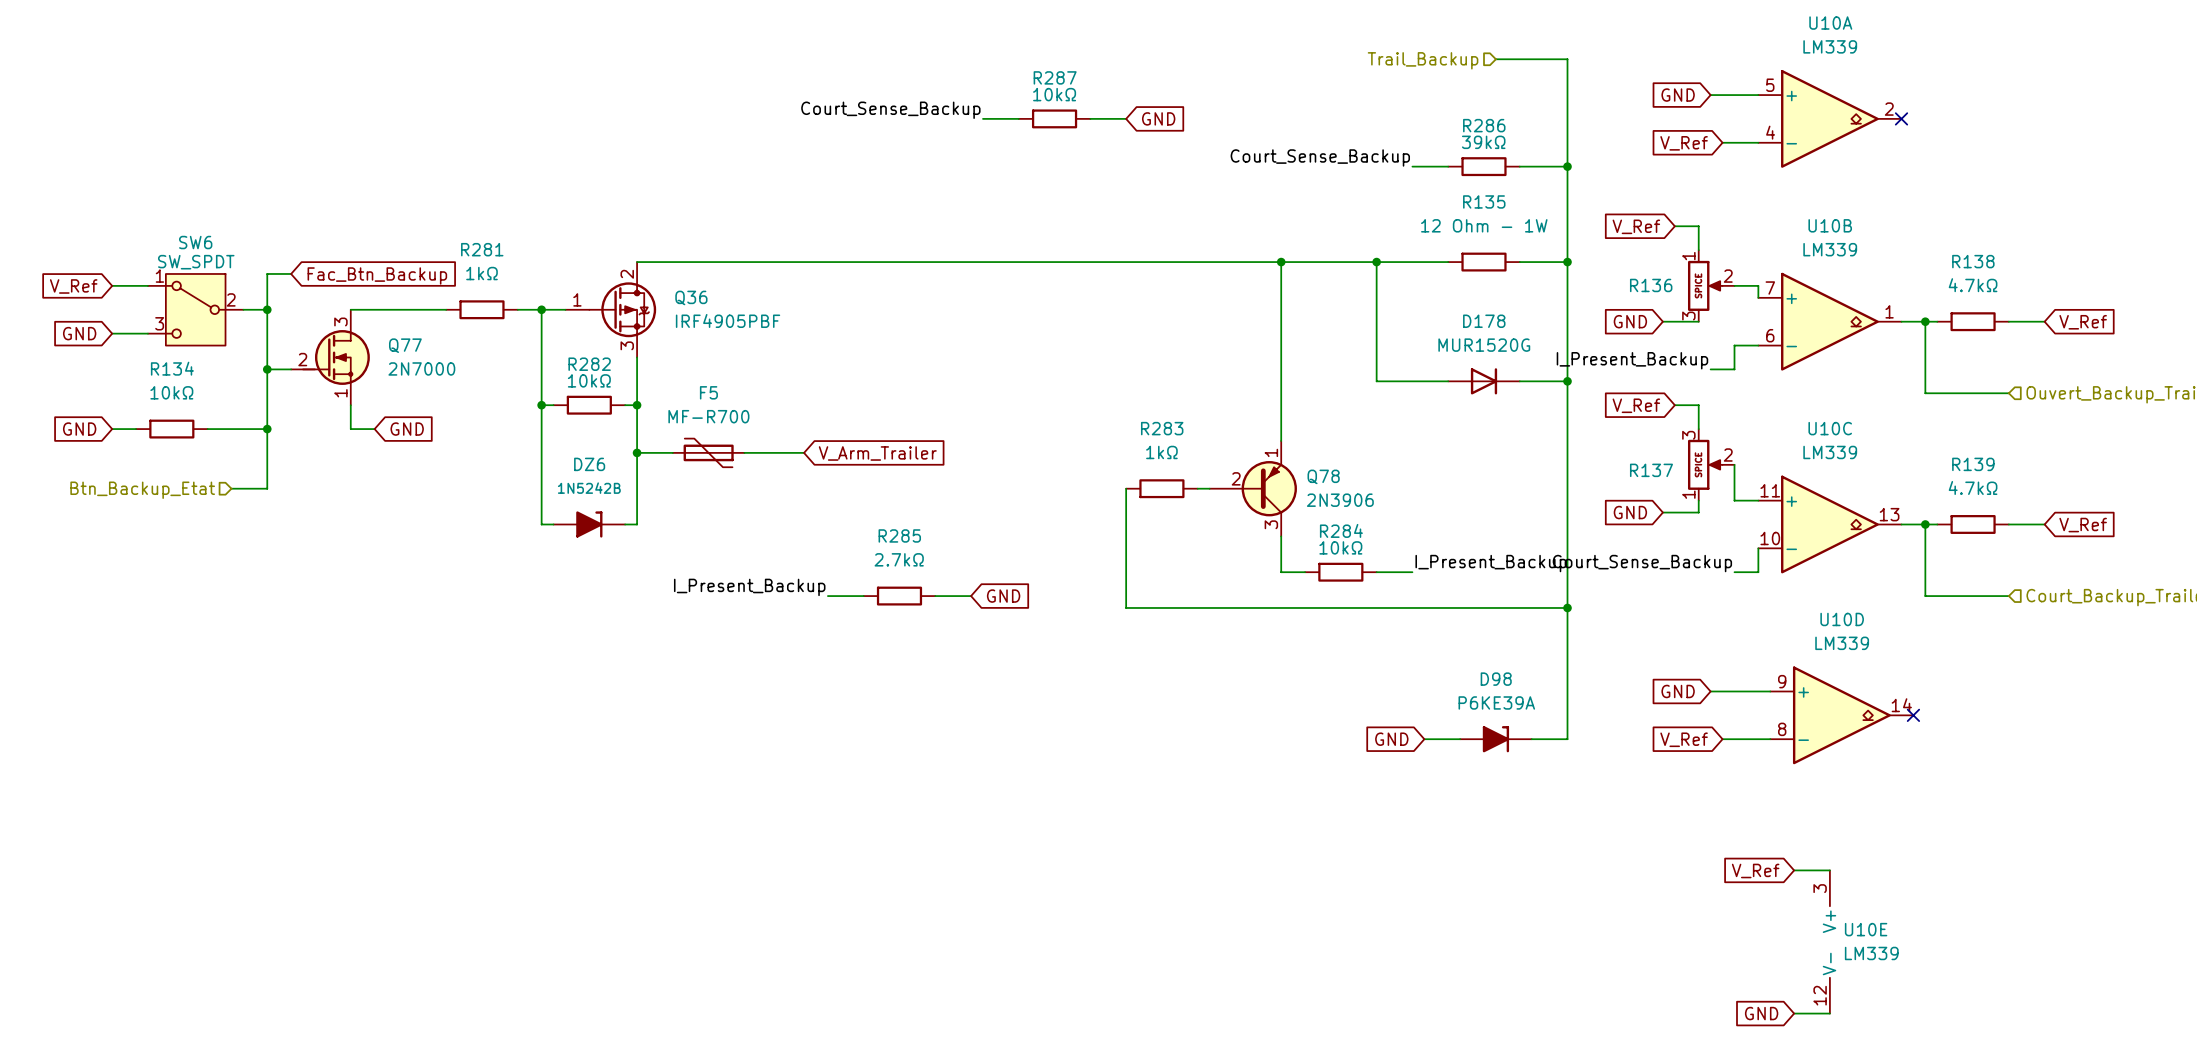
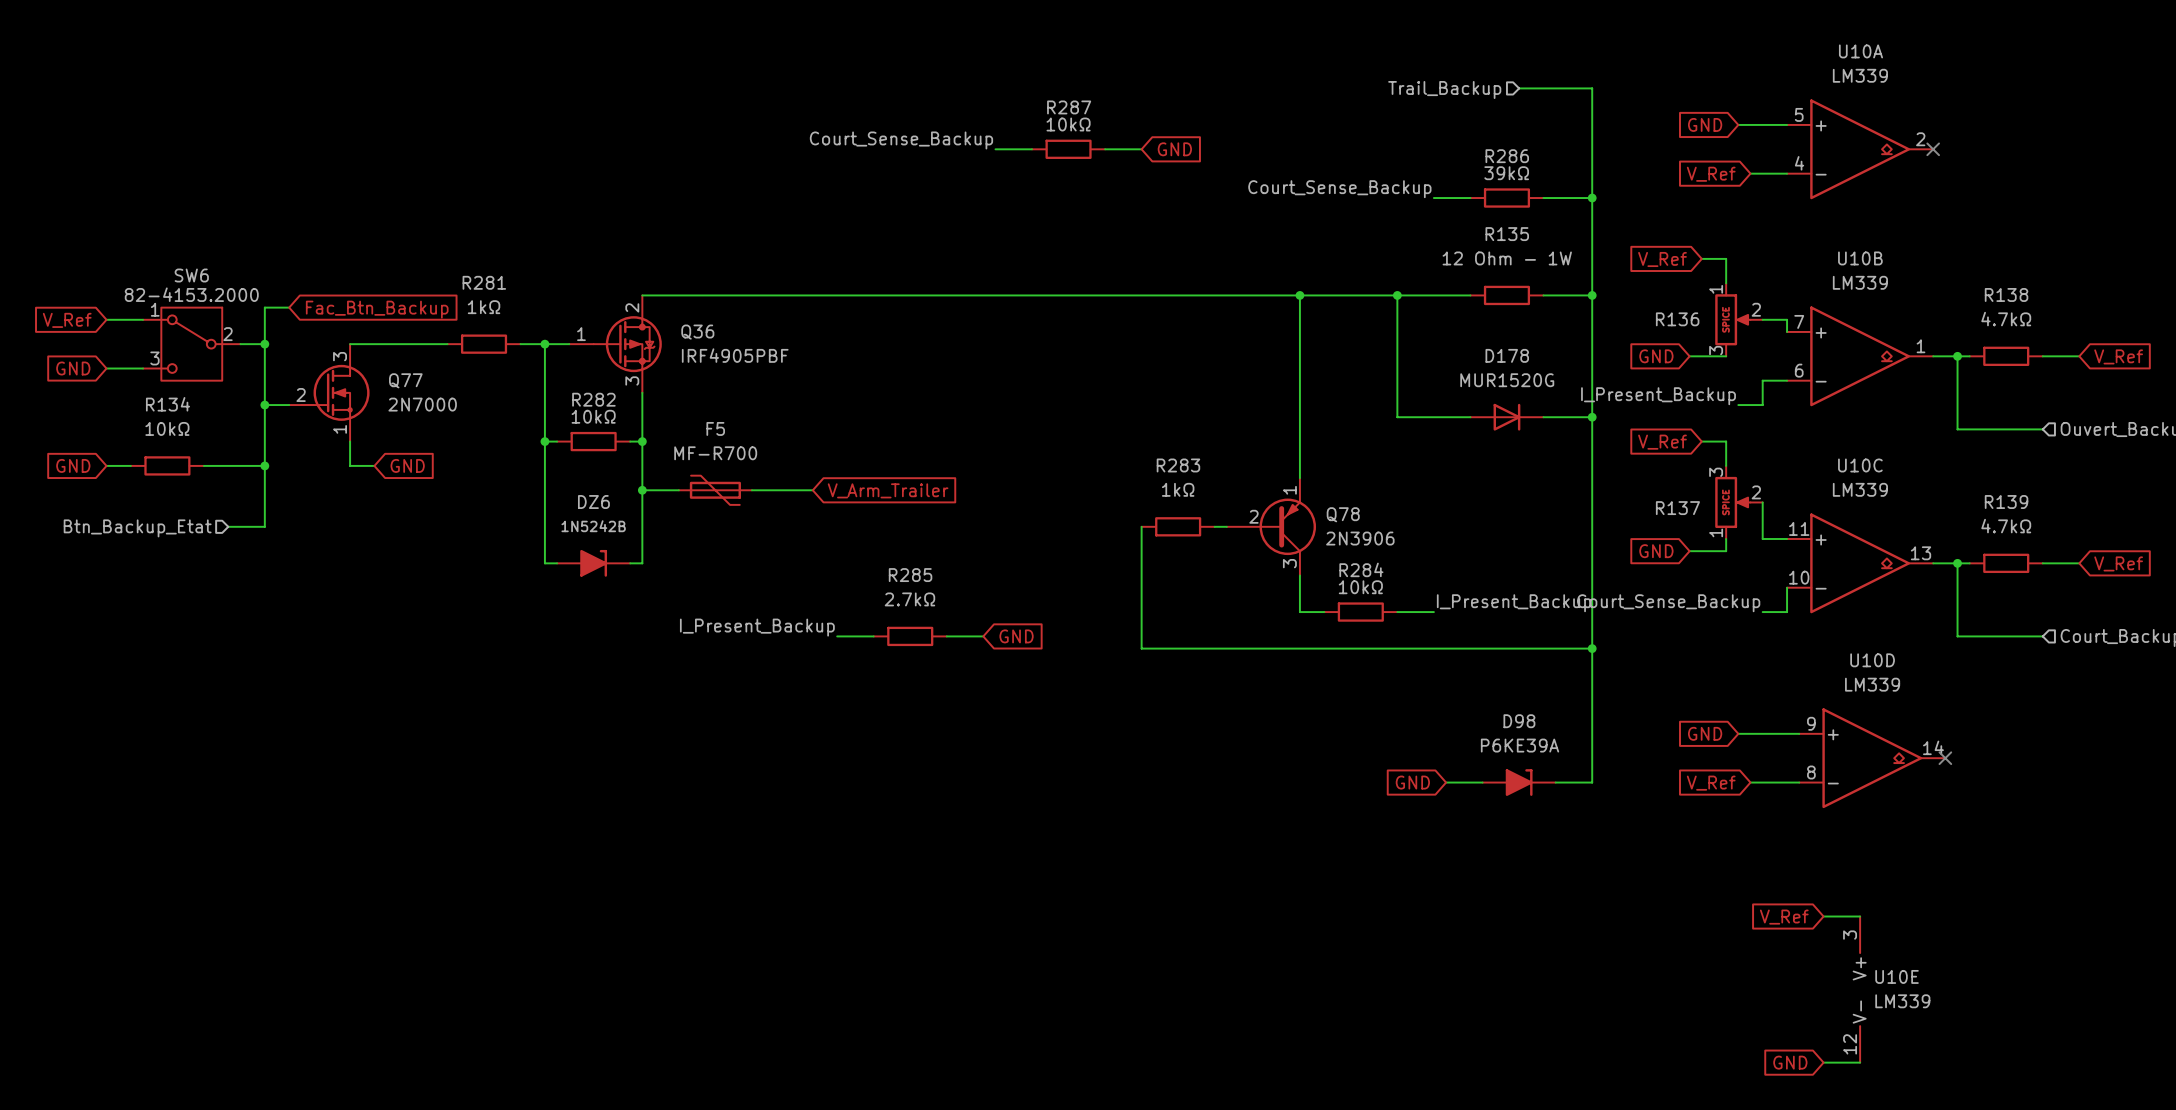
SW6 value: SW_SPDT (196, 262) -> 82-4153.2000 (191, 294)

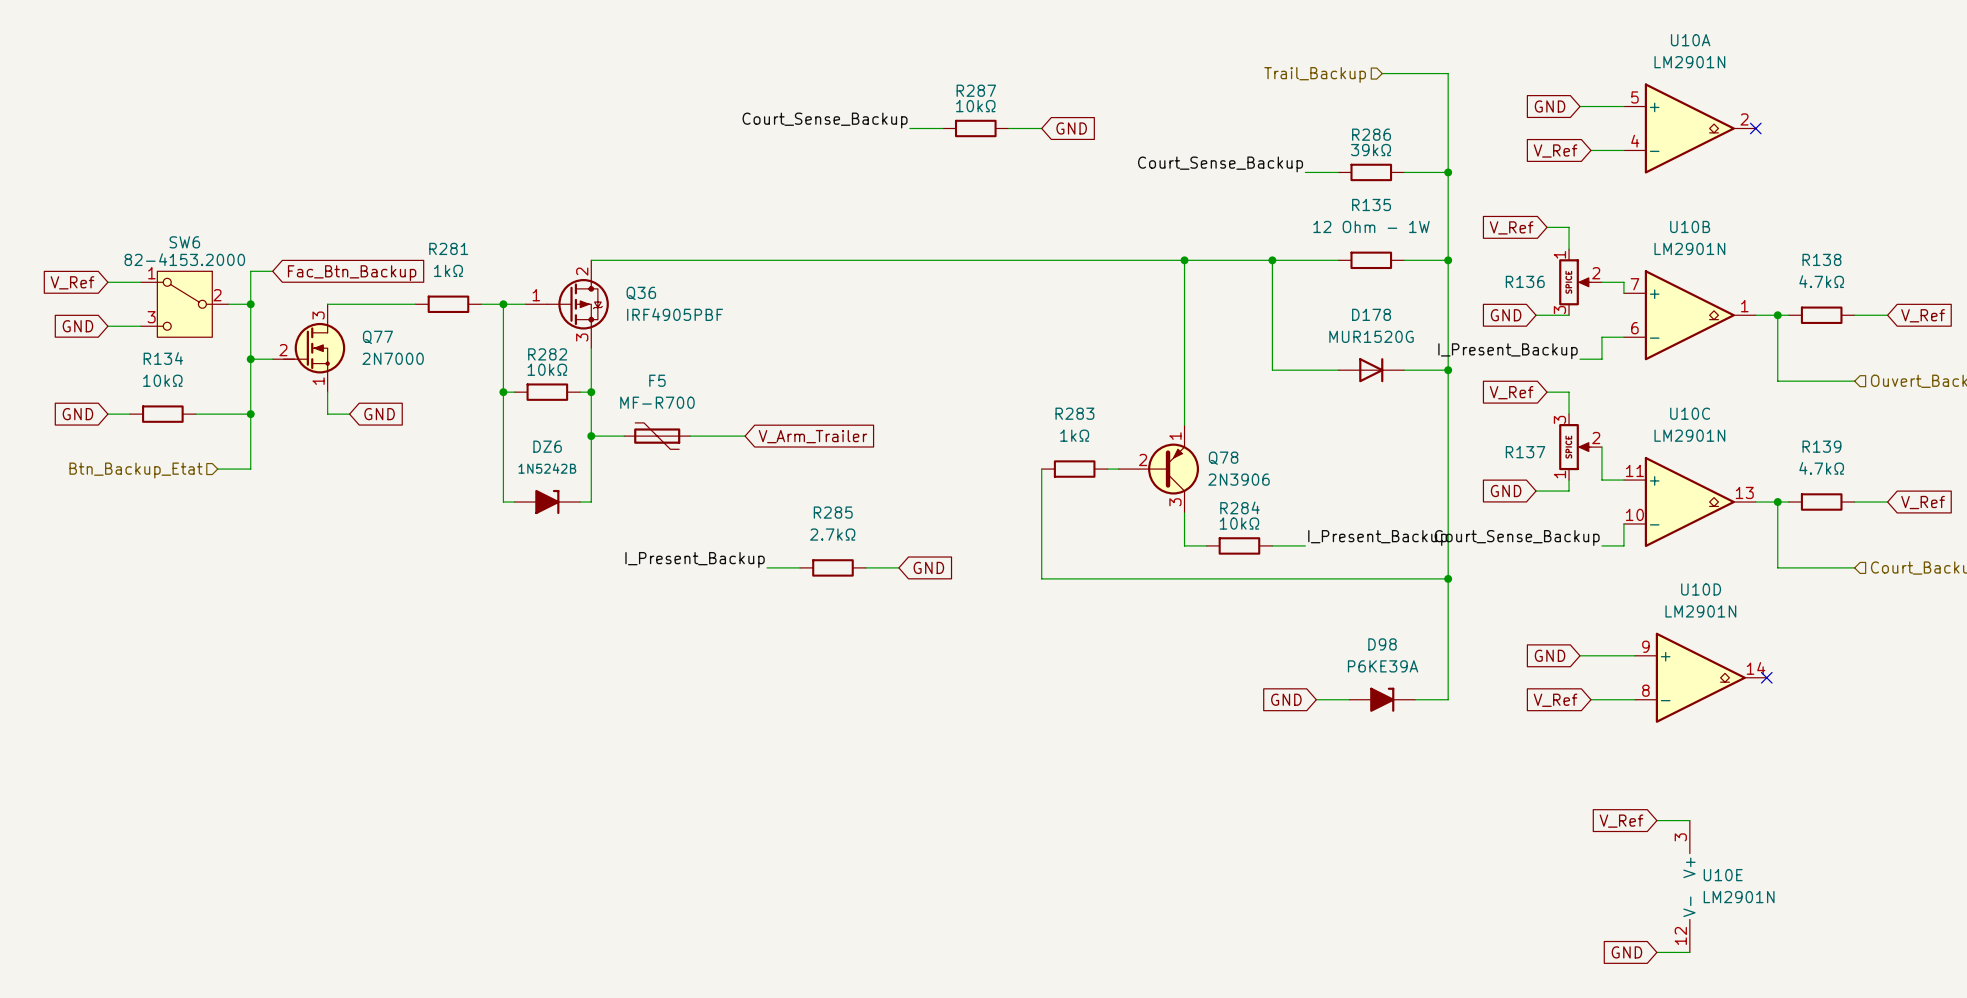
U10A value: LM339 (1860, 75) -> LM2901N (1689, 62)
U10B value: LM339 (1860, 282) -> LM2901N (1689, 248)
U10C value: LM339 (1860, 489) -> LM2901N (1689, 435)
U10D value: LM339 (1872, 684) -> LM2901N (1700, 611)
U10E value: LM339 (1902, 1001) -> LM2901N (1739, 897)

